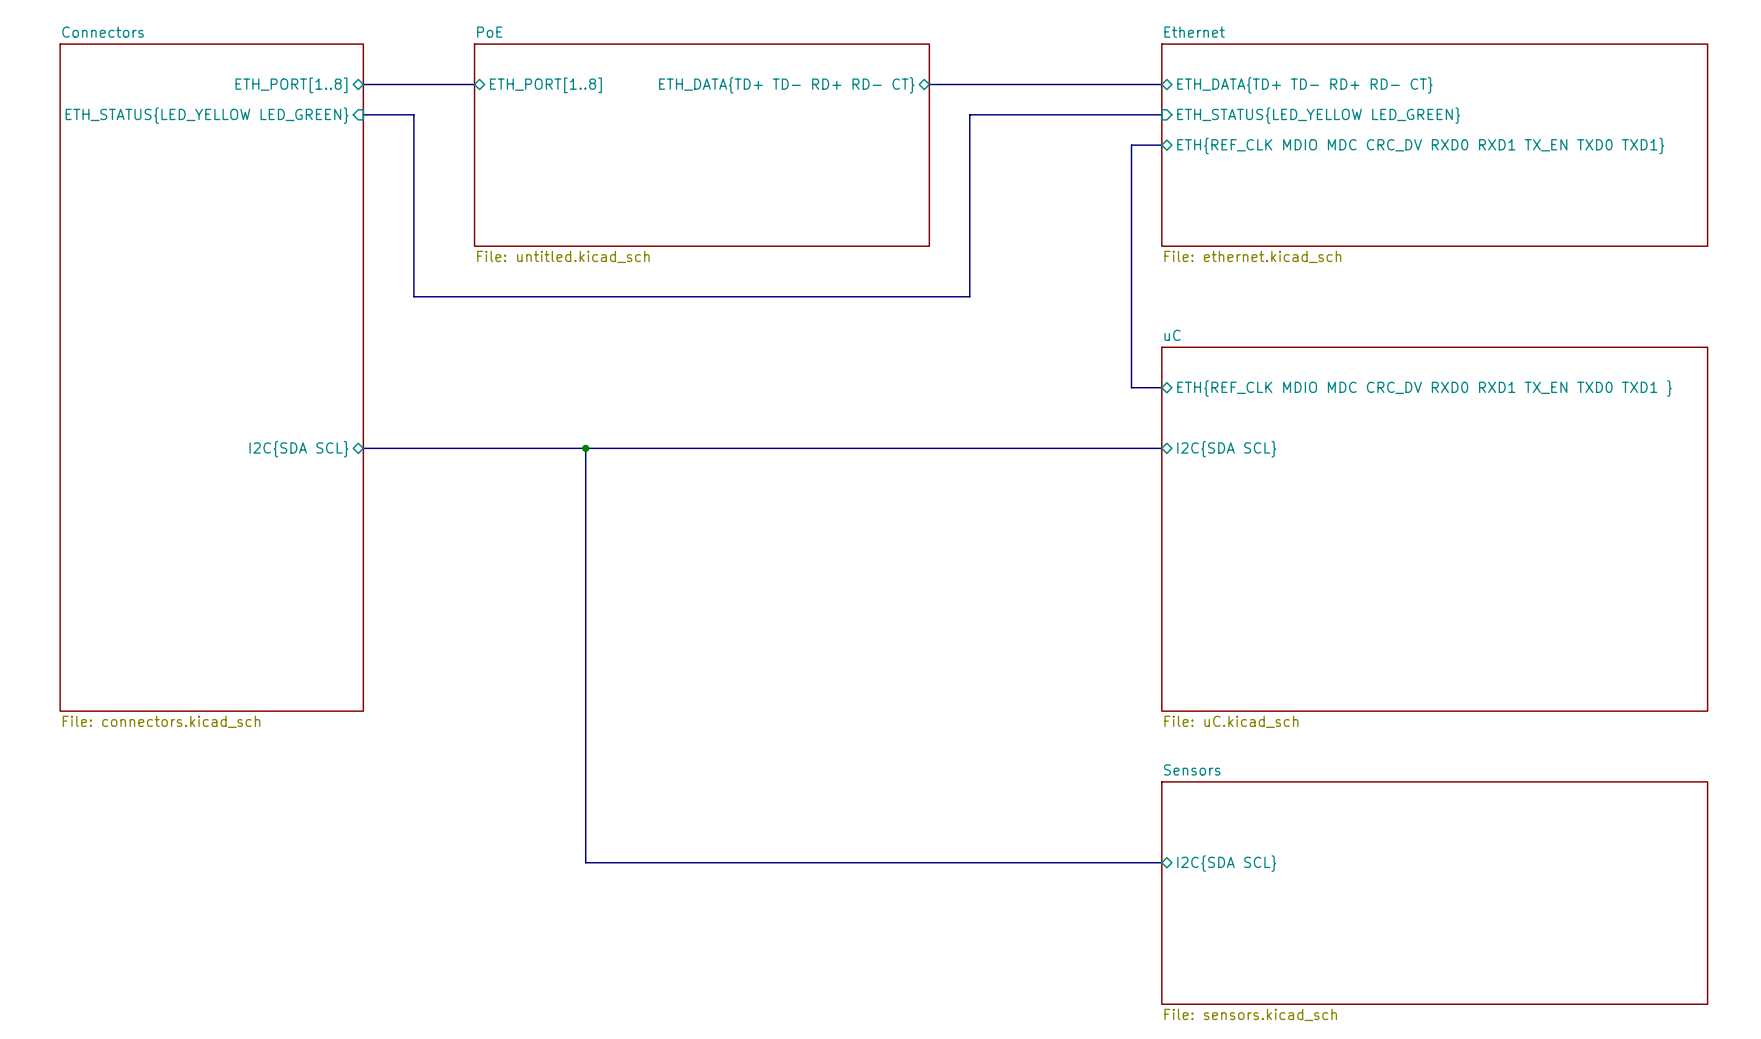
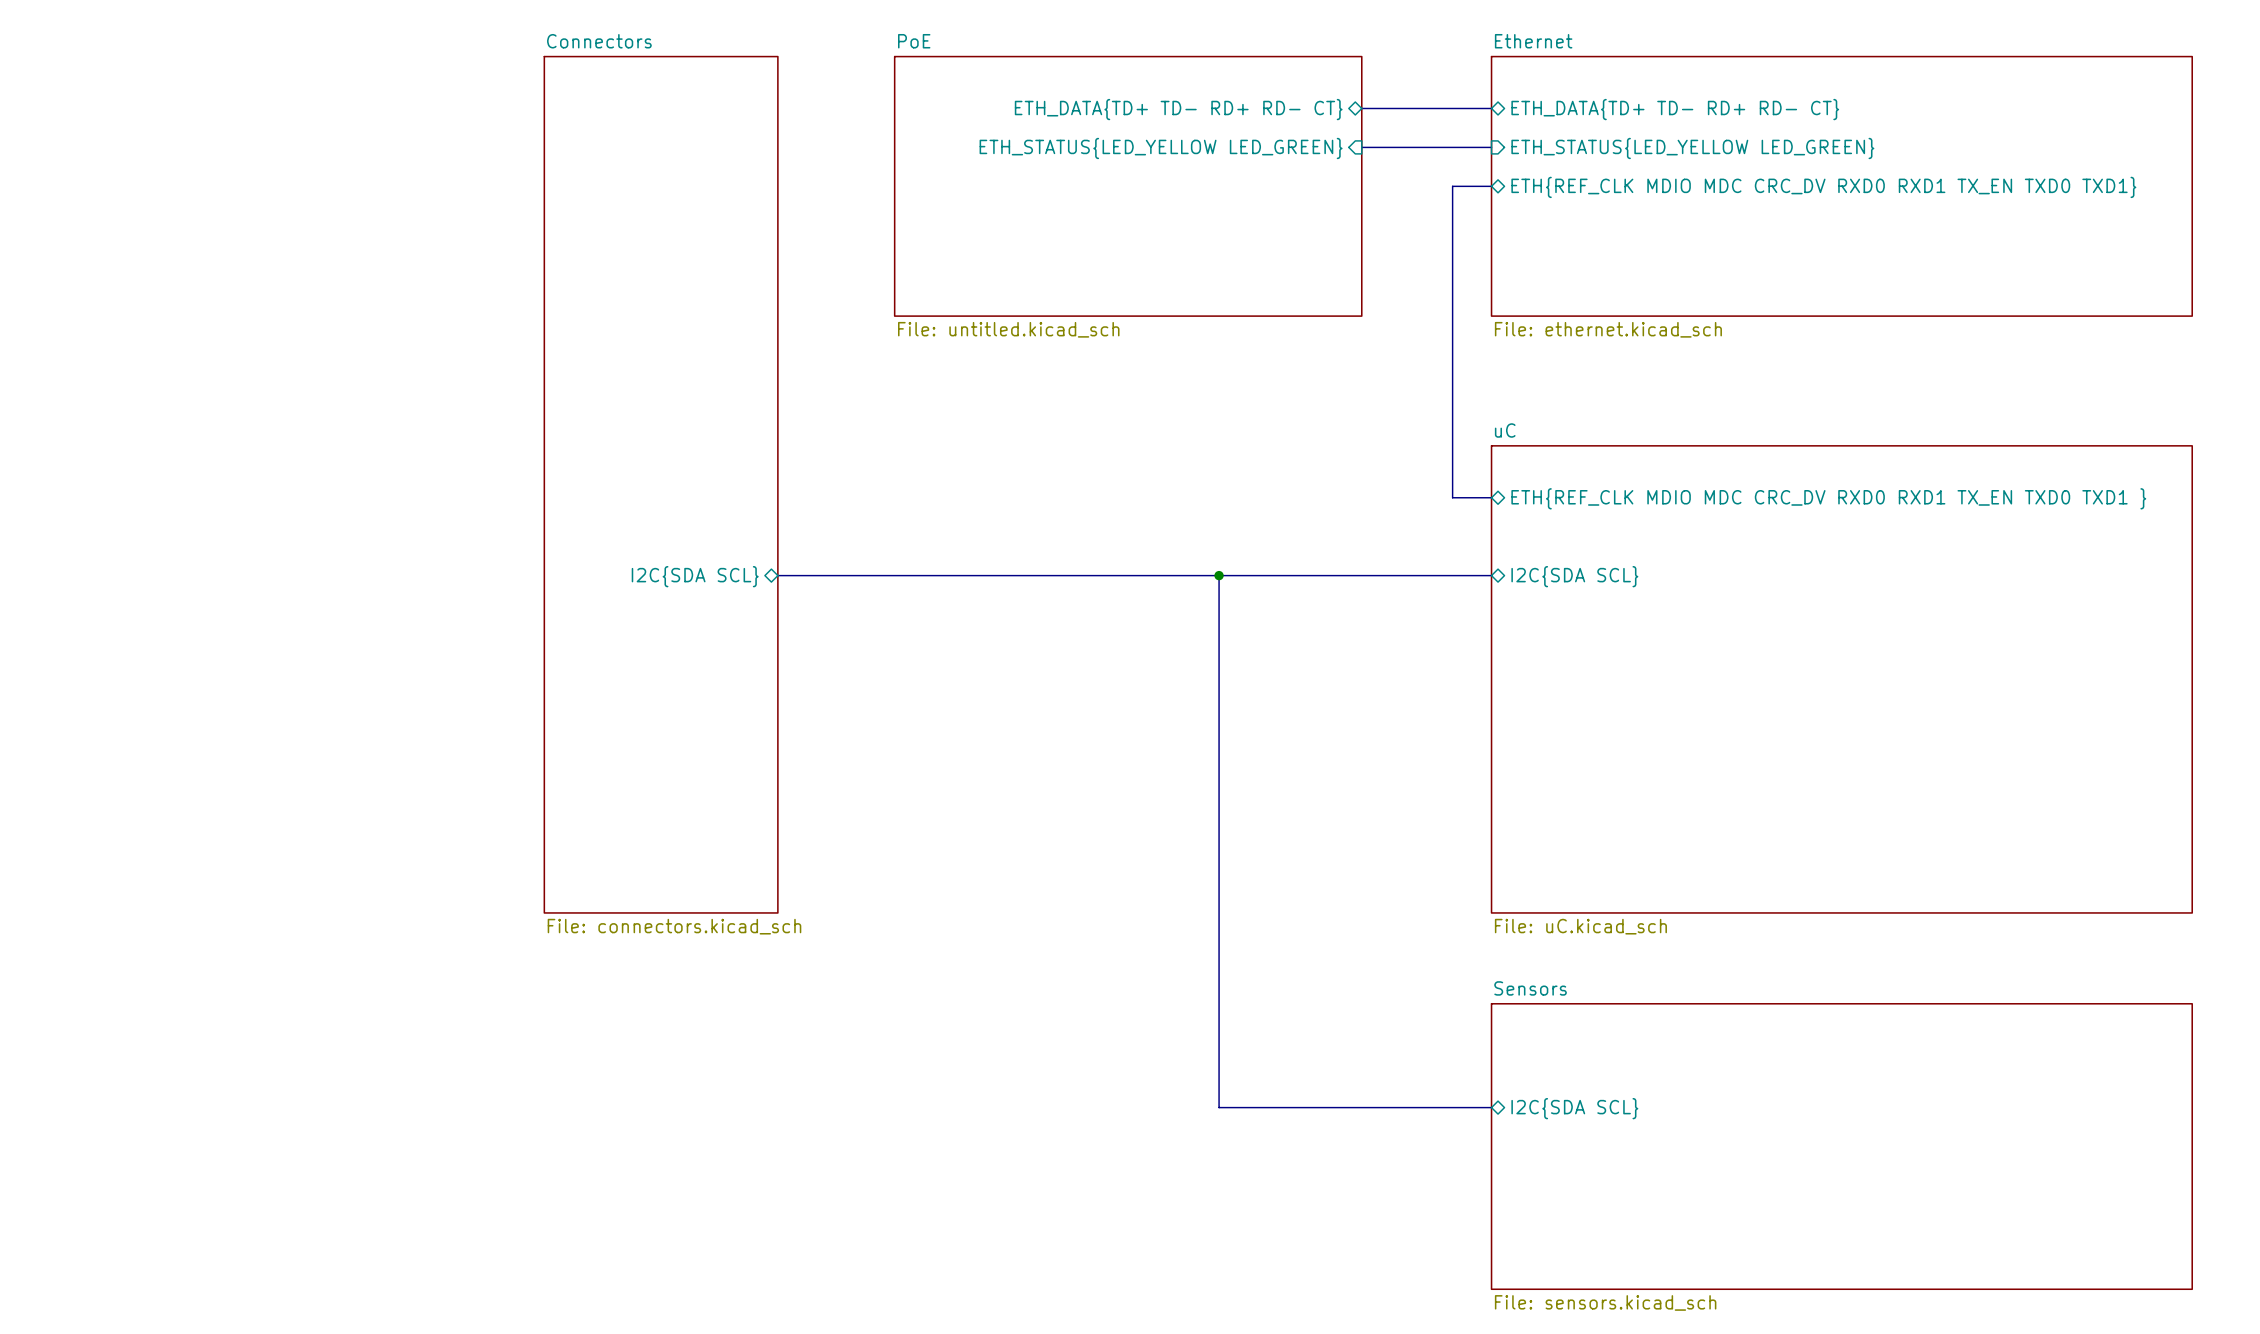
bus: (363, 84) (474, 84) -> none
bus: (929, 84) (1060, 84) -> none
sheet pin: ETH_PORT[1..8] (291, 85) -> none
sheet pin: ETH_PORT[1..8] (545, 85) -> none
sheet pin position: ETH_DATA{TD+ TD- RD+ RD- CT} (786, 85) -> ETH_DATA{TD+ TD- RD+ RD- CT} (1178, 109)
bus: (363, 114) (413, 114) (413, 296) (969, 296) (969, 114) (1060, 114) -> none
sheet pin: ETH_STATUS{LED_YELLOW LED_GREEN} (207, 115) -> none
sheet pin: none -> ETH_STATUS{LED_YELLOW LED_GREEN} (1161, 148)
sheet PoE: File: untitled.kicad_sch (701, 145) -> none
sheet PoE: none -> File: untitled.kicad_sch (1128, 186)
sheet Connectors: File: connectors.kicad_sch (211, 377) -> none
sheet Connectors: none -> File: connectors.kicad_sch (661, 484)
bus: (363, 448) (605, 448) -> none
bus: (585, 448) (585, 862) (949, 862) -> (1219, 575) (1219, 1107)
junction: (585, 448) -> none
junction: none -> (1219, 575)
sheet pin: I2C{SDA SCL} (298, 449) -> none
sheet pin: none -> I2C{SDA SCL} (695, 576)

